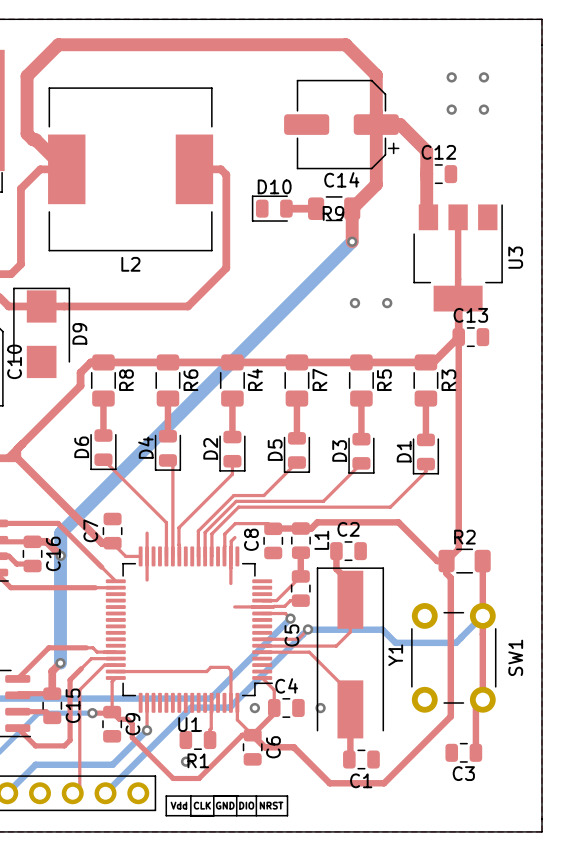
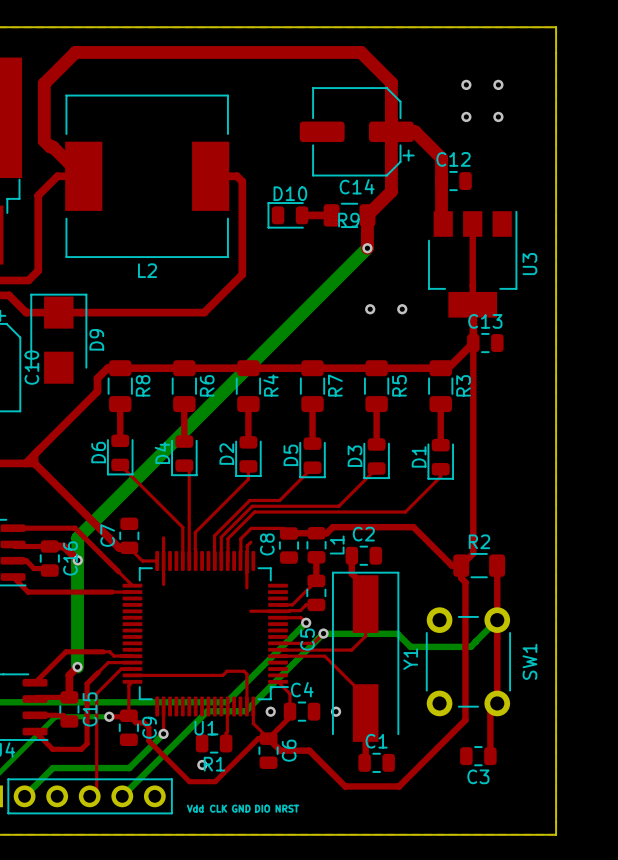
C1 name position: C1 (361, 780) -> C1 (376, 741)
line: (166, 796) (287, 796) (287, 815) (166, 815) (166, 796) -> none
line: (190, 796) (190, 815) -> none
line: (213, 796) (213, 815) -> none
line: (236, 796) (236, 815) -> none
line: (256, 796) (256, 815) -> none

